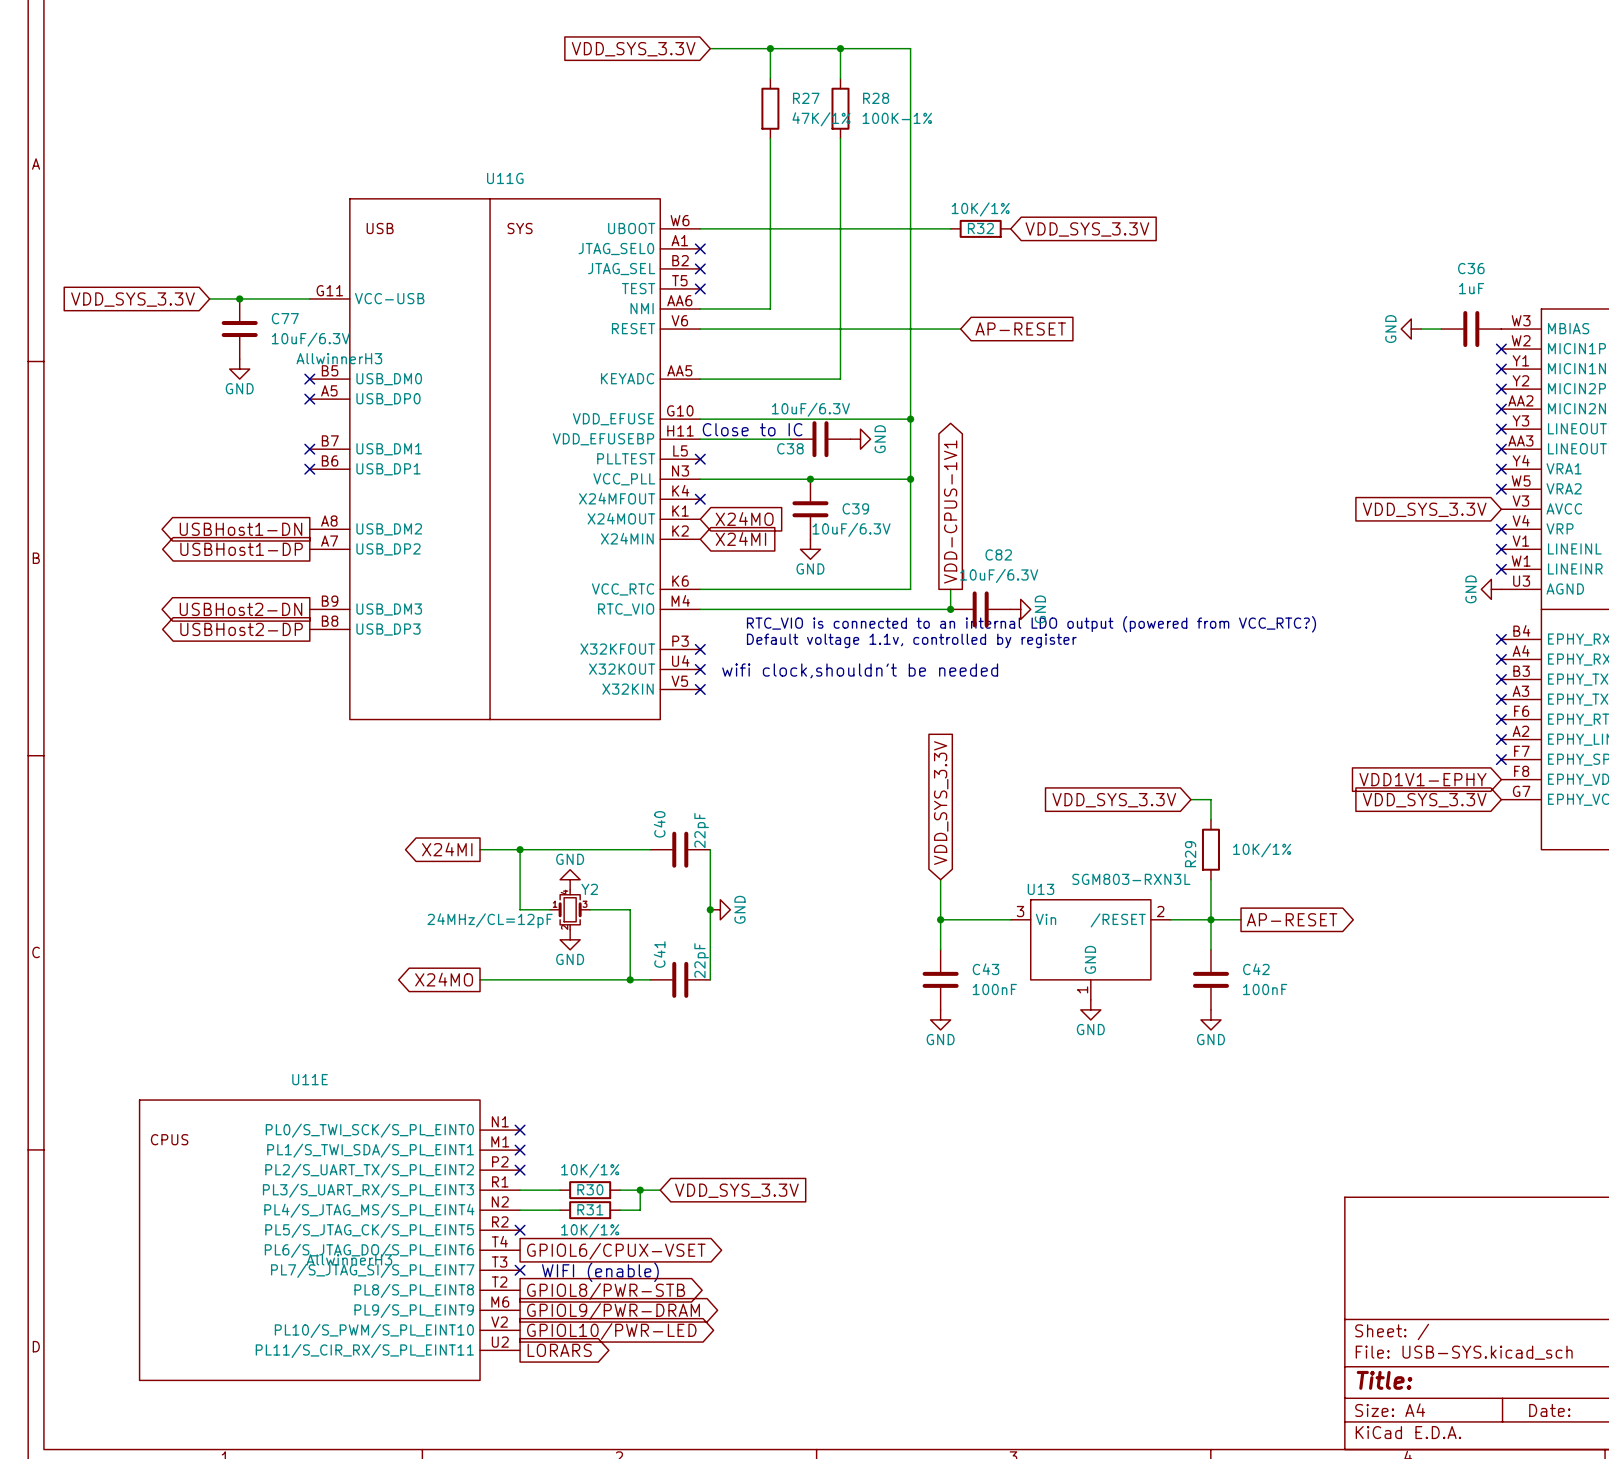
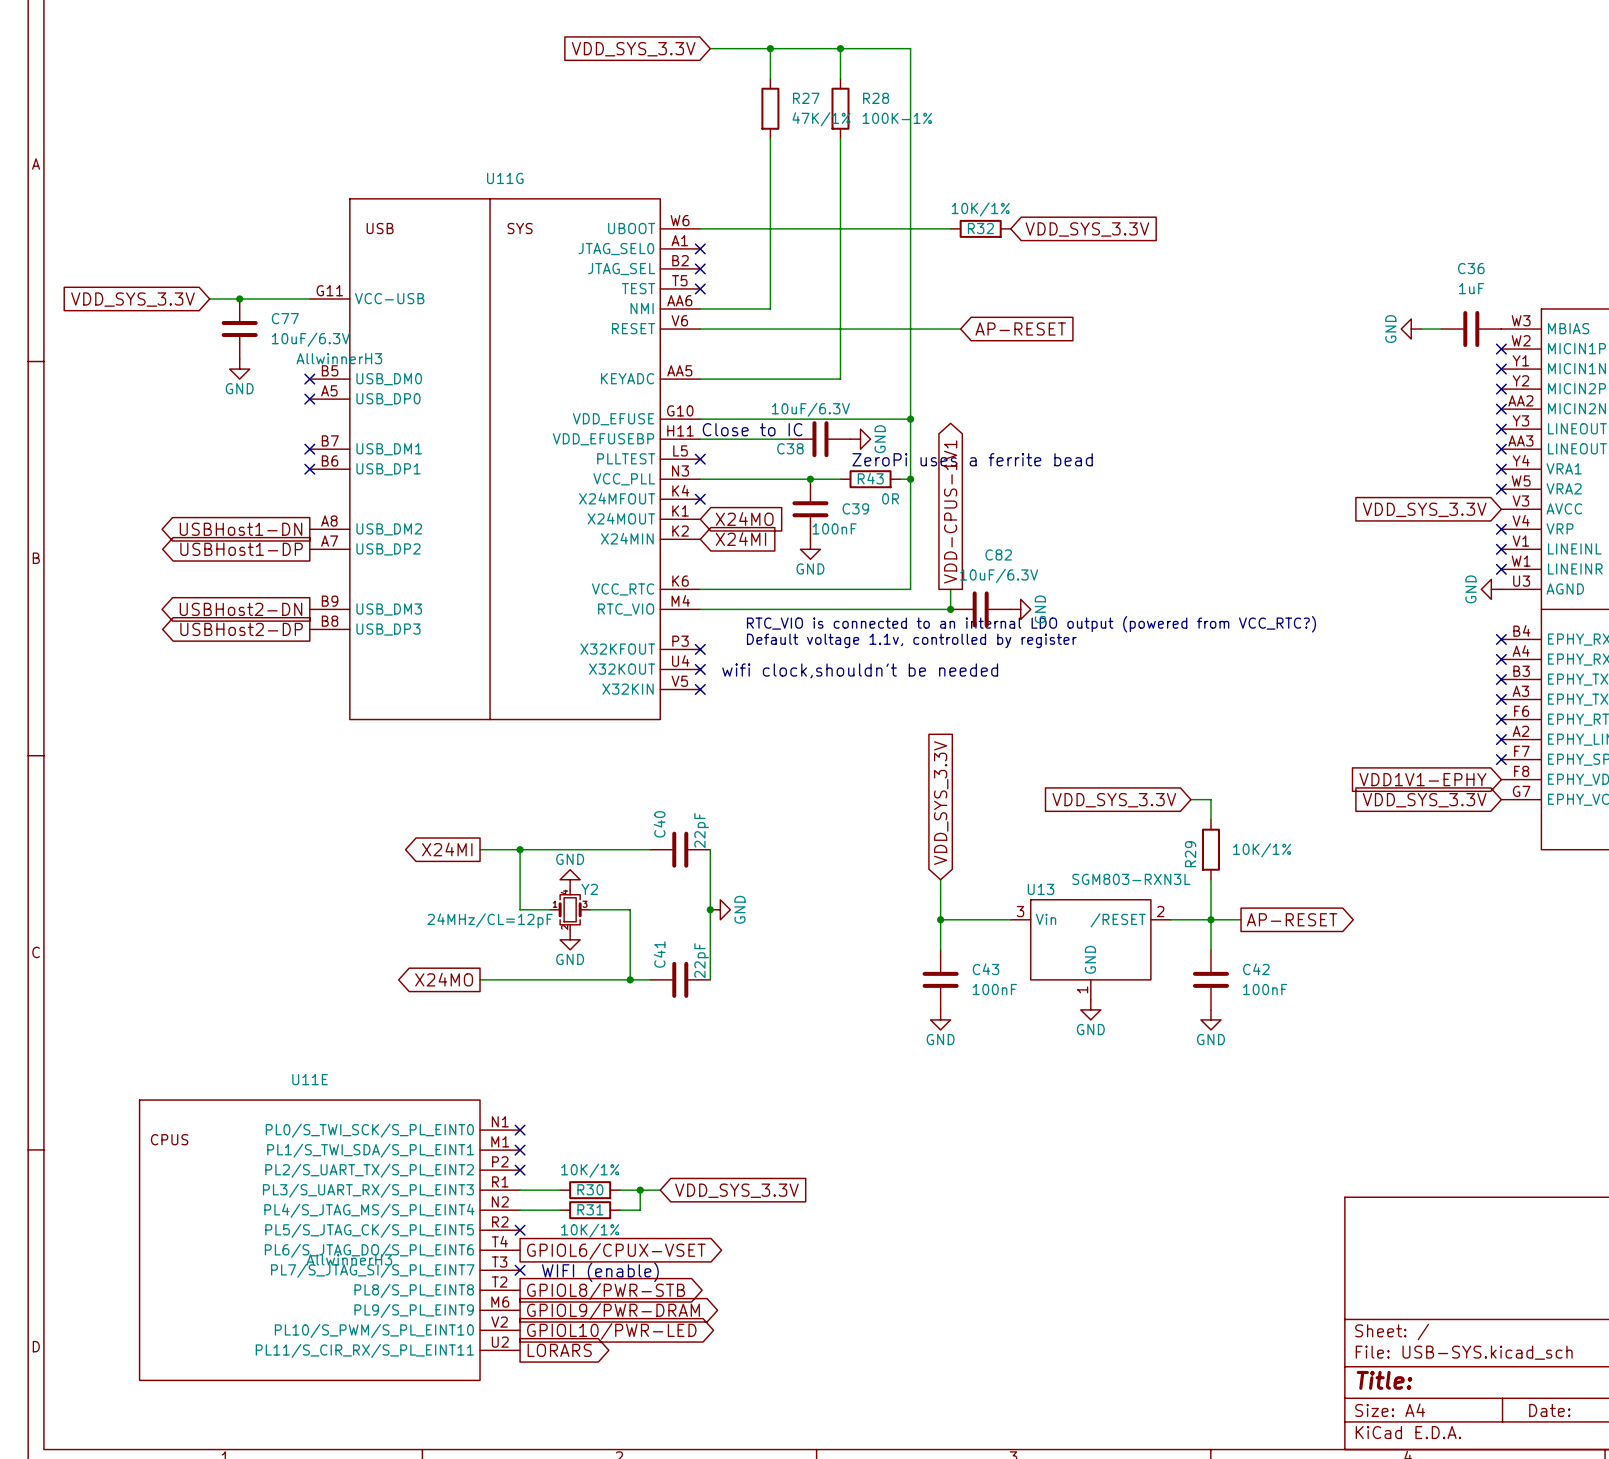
text: none -> ZeroPi uses a ferrite bead (972, 459)
R43: none -> 0R (870, 479)
C39 value: 10uF/6.3V (851, 529) -> 100nF (834, 528)

